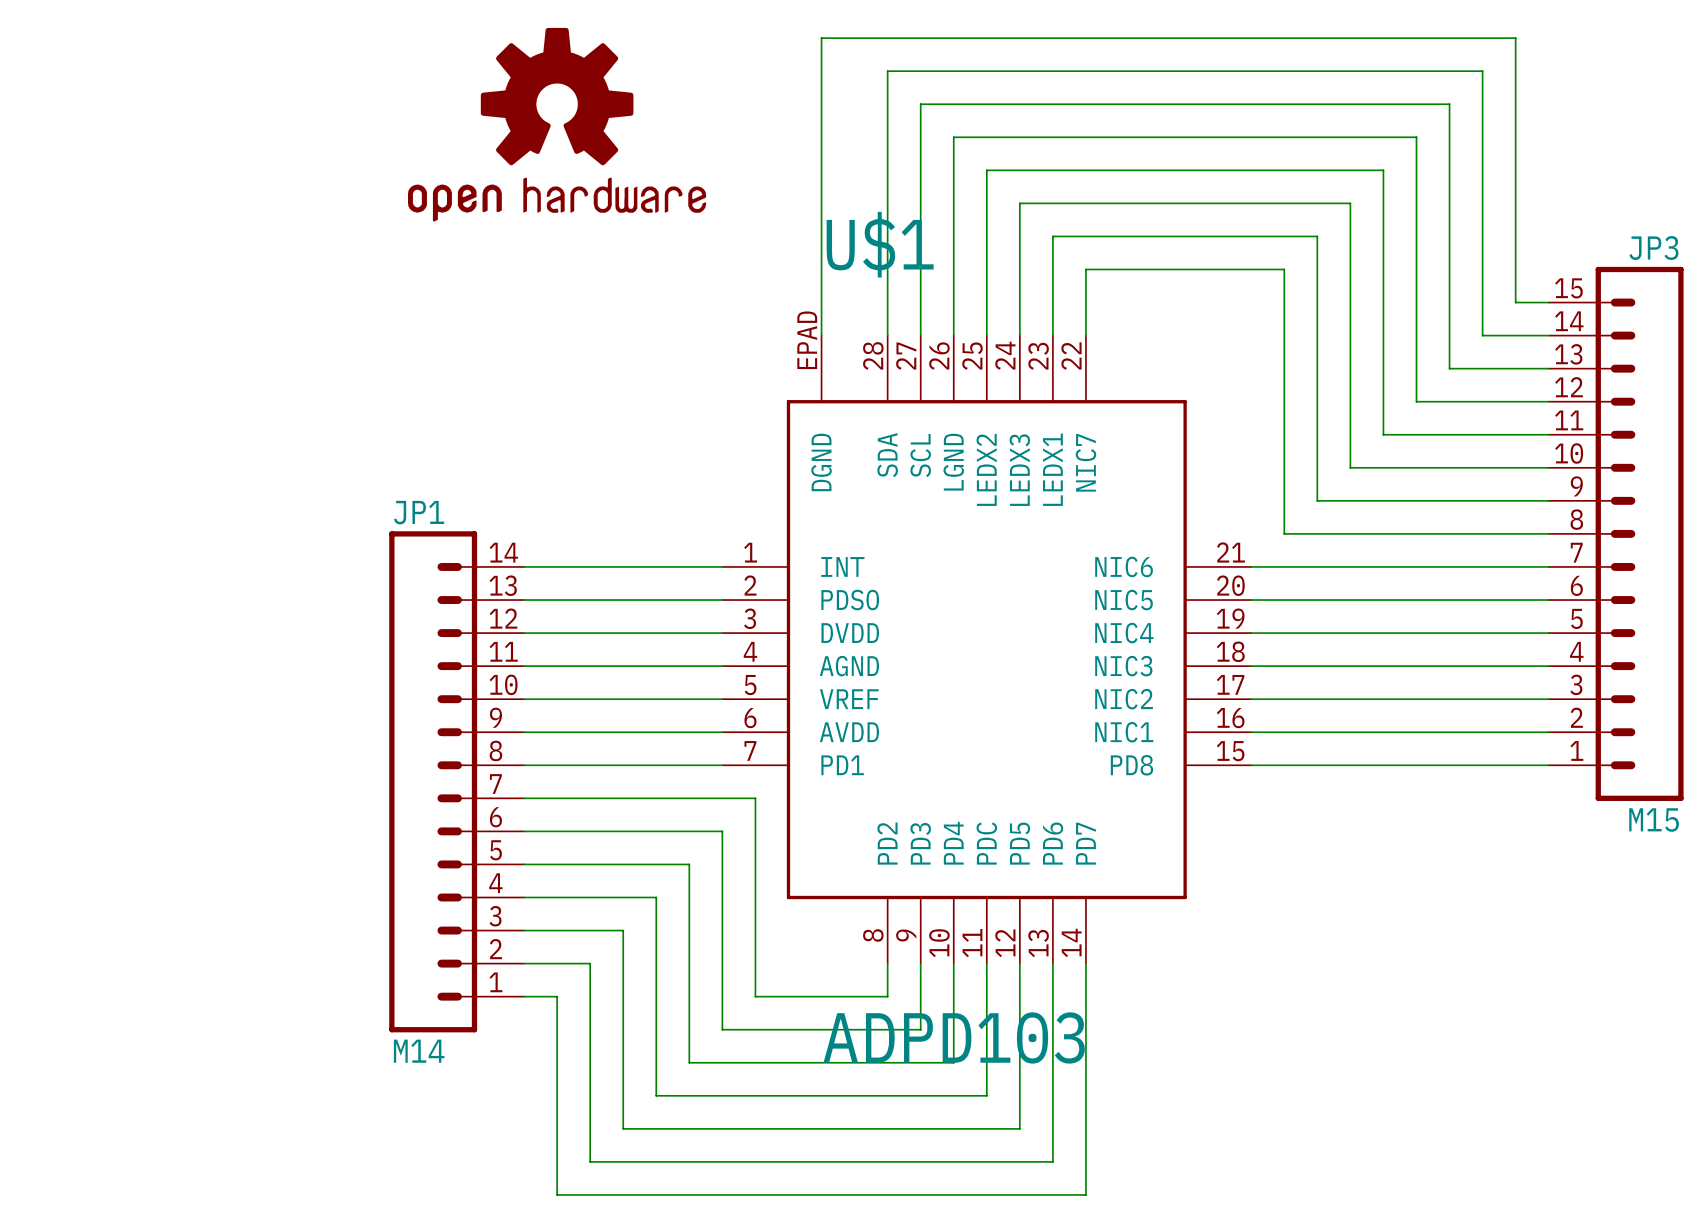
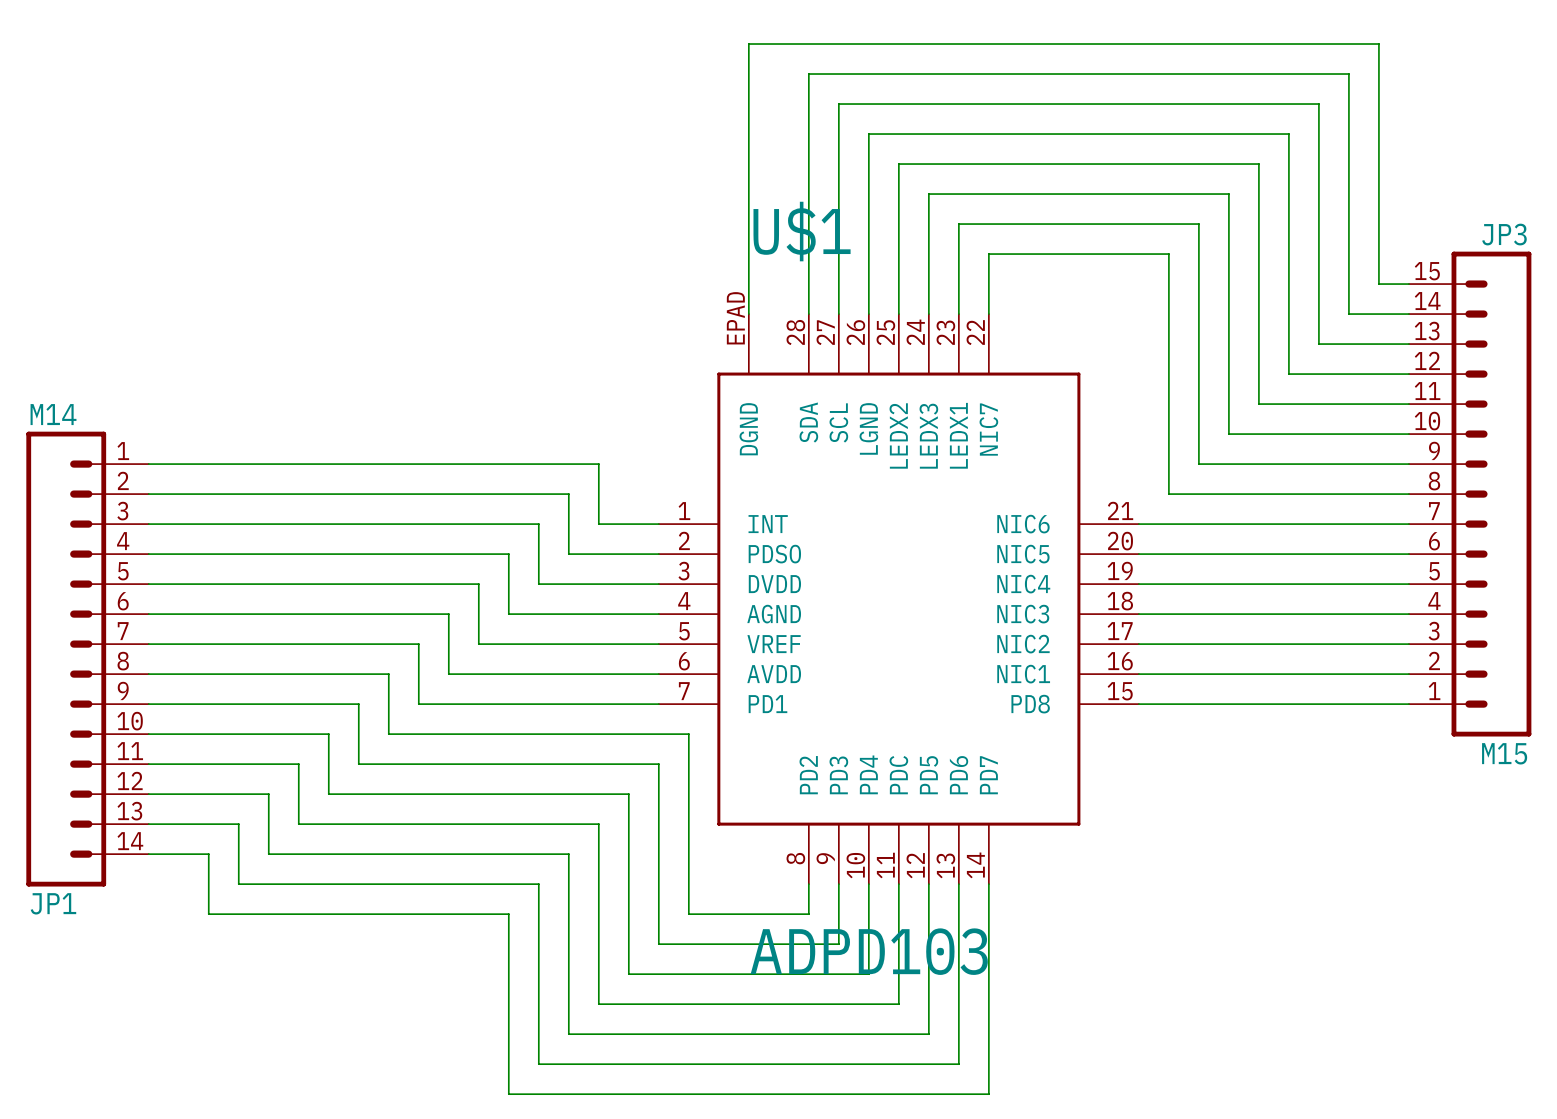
part: (557, 124) -> none
wire: none -> (148, 464) (598, 464) (598, 524)
wire: none -> (148, 524) (478, 524)
wire: (590, 566) (656, 566) -> (538, 524) (538, 584)
wire: none -> (148, 554) (478, 554)
wire: (557, 600) (623, 600) -> (148, 494) (568, 494) (568, 554)
wire: none -> (148, 584) (478, 584) (478, 644)
wire: (524, 633) (590, 633) -> none
wire: none -> (148, 614) (448, 614) (448, 674) (478, 674)
wire: (524, 666) (557, 666) -> (508, 554) (508, 614)
wire: none -> (148, 644) (418, 644) (418, 704) (478, 704)
wire: none -> (148, 674) (388, 674) (388, 734) (478, 734)
wire: none -> (148, 704) (358, 704) (358, 764) (478, 764)
JP1 flip: as is (433, 781) -> up-down (66, 659)
JP1 position: (456, 781) -> (87, 659)
wire: none -> (148, 734) (328, 734) (328, 794) (478, 794)
wire: none -> (148, 764) (298, 764) (298, 824) (478, 824)
wire: none -> (148, 794) (268, 794) (268, 854) (478, 854)
wire: none -> (148, 824) (238, 824) (238, 884) (478, 884)
wire: none -> (148, 854) (208, 854) (208, 914) (478, 914)

